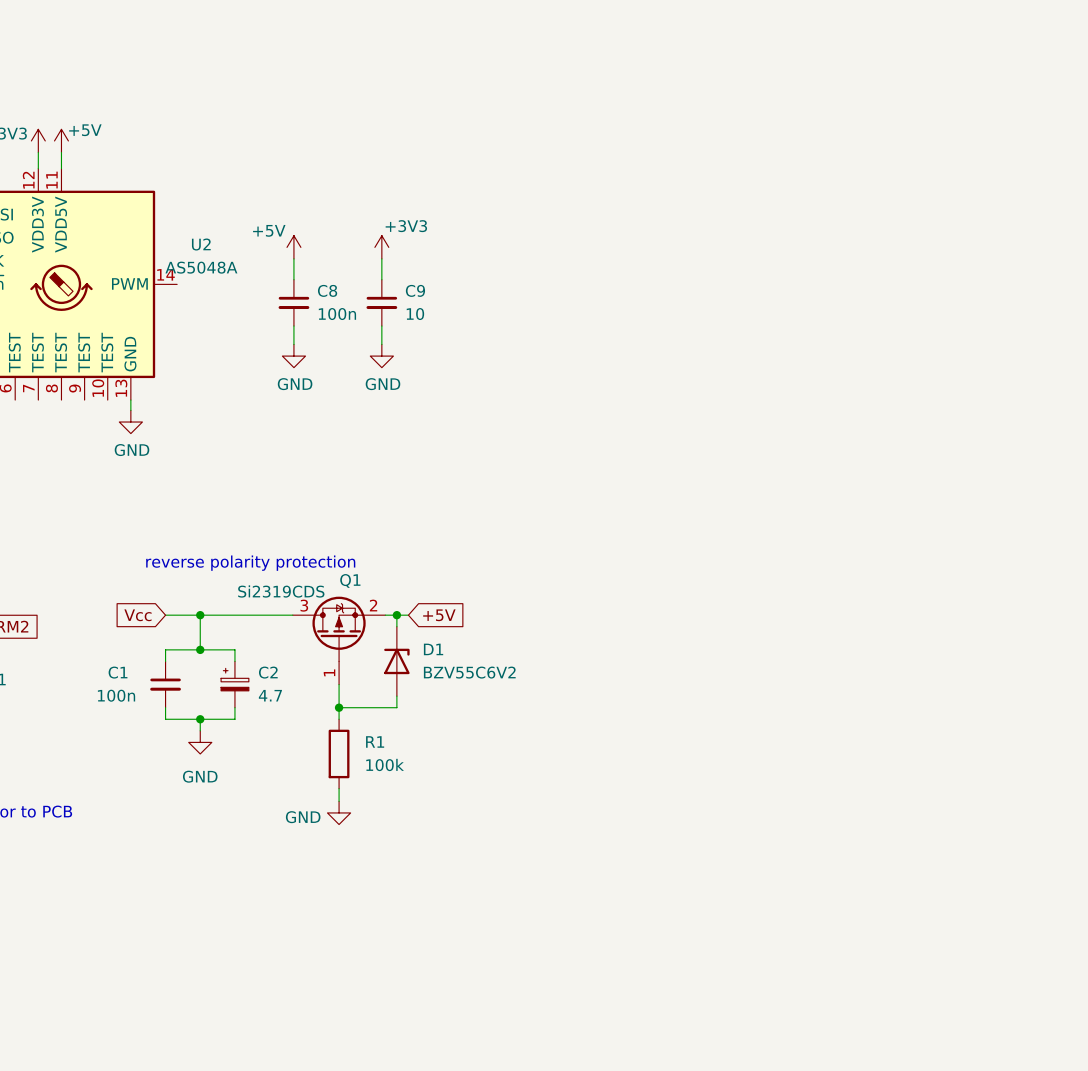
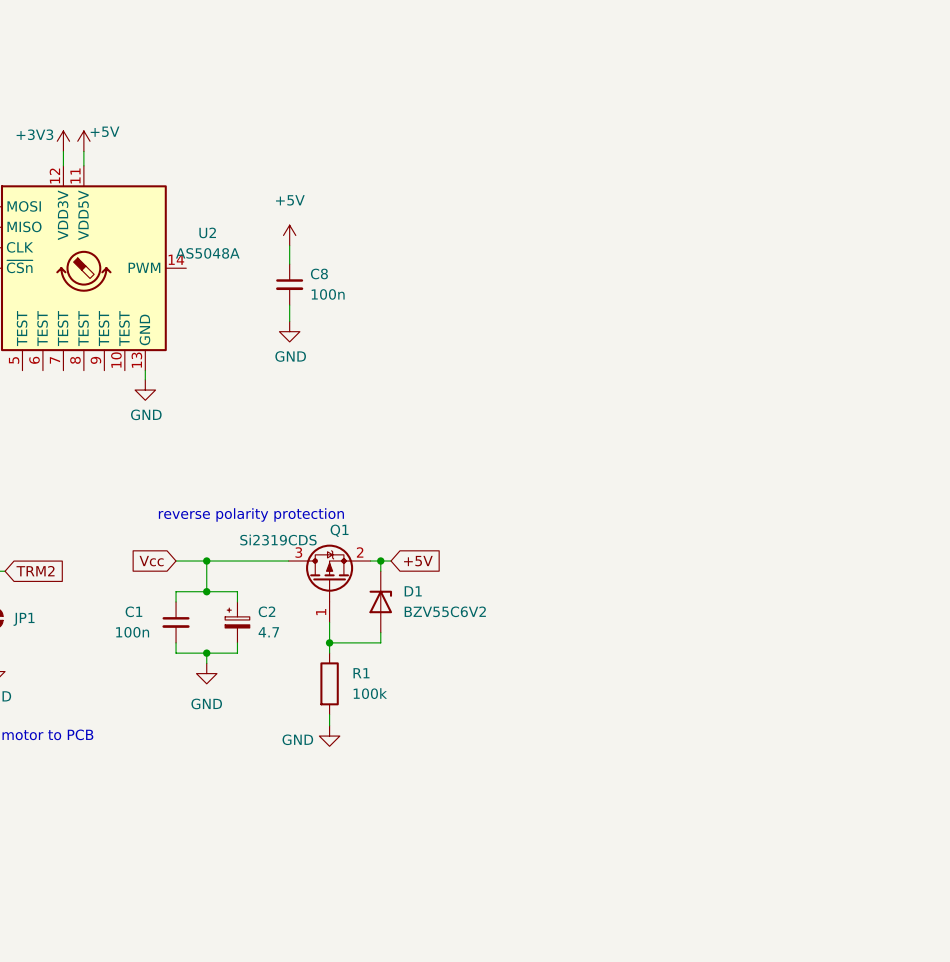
power symbol text position: +5V (269, 230) -> +5V (290, 200)
power symbol: +3V3 (381, 247) -> none
wire: (381, 258) (381, 279) -> none
C9: 10 (381, 302) -> none
wire: (381, 326) (381, 344) -> none
power symbol: GND (381, 356) -> none

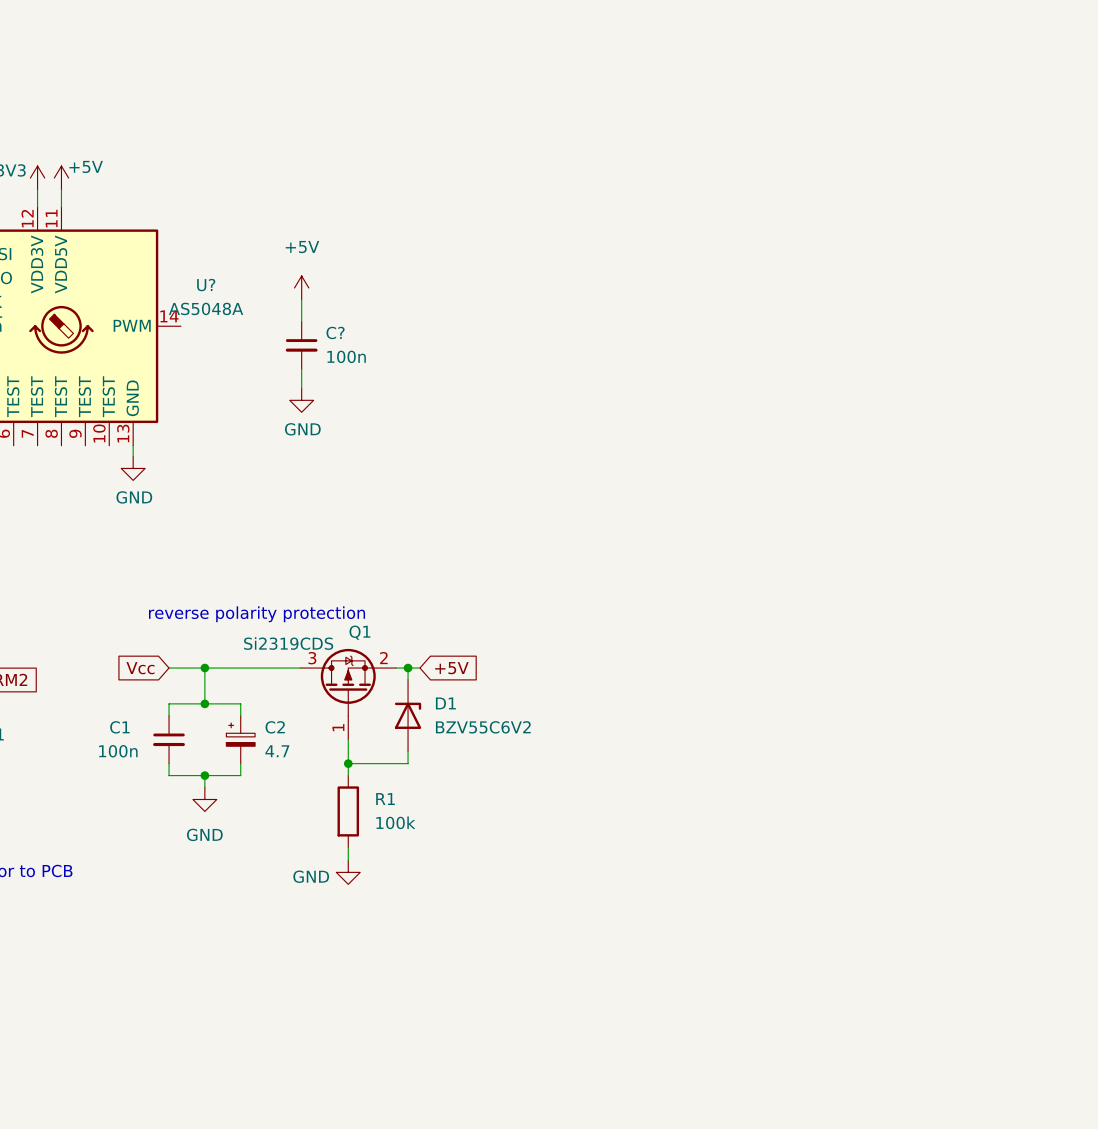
U2 name: U2 (207, 232) -> U? (206, 285)
C8 name: C8 (319, 273) -> C? (335, 332)

